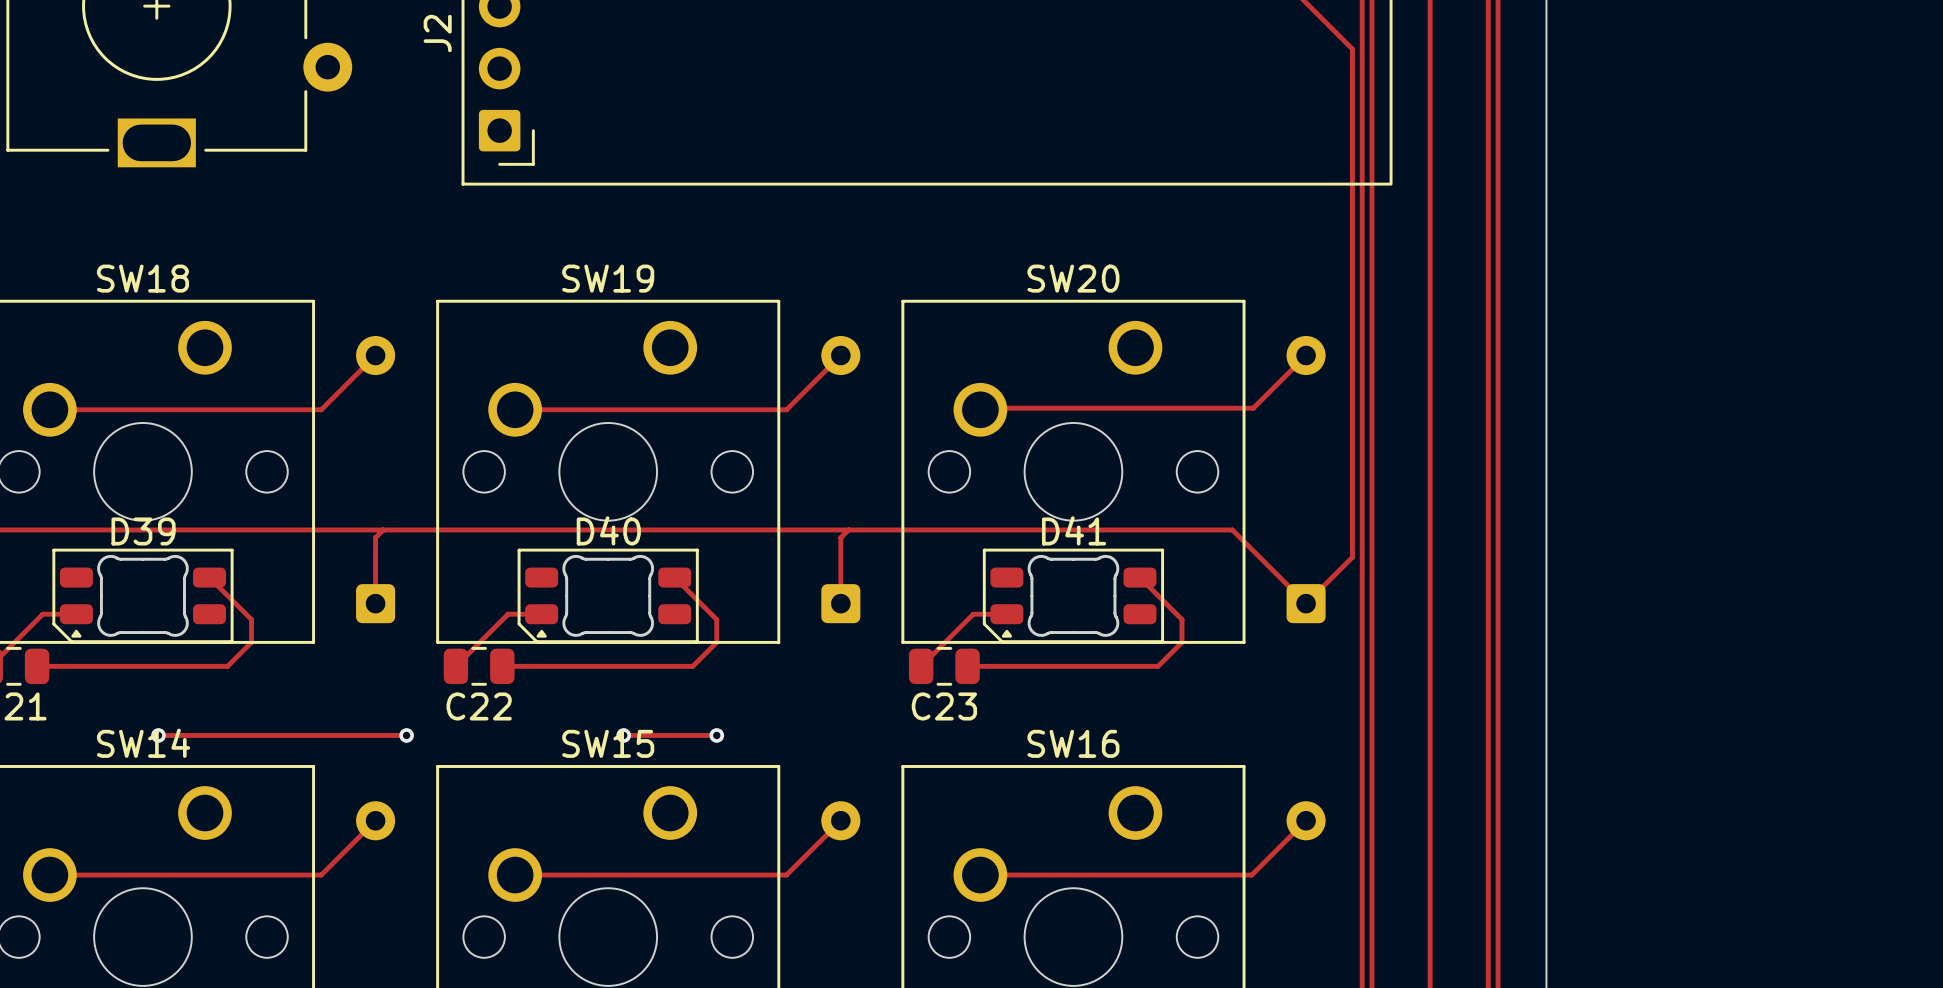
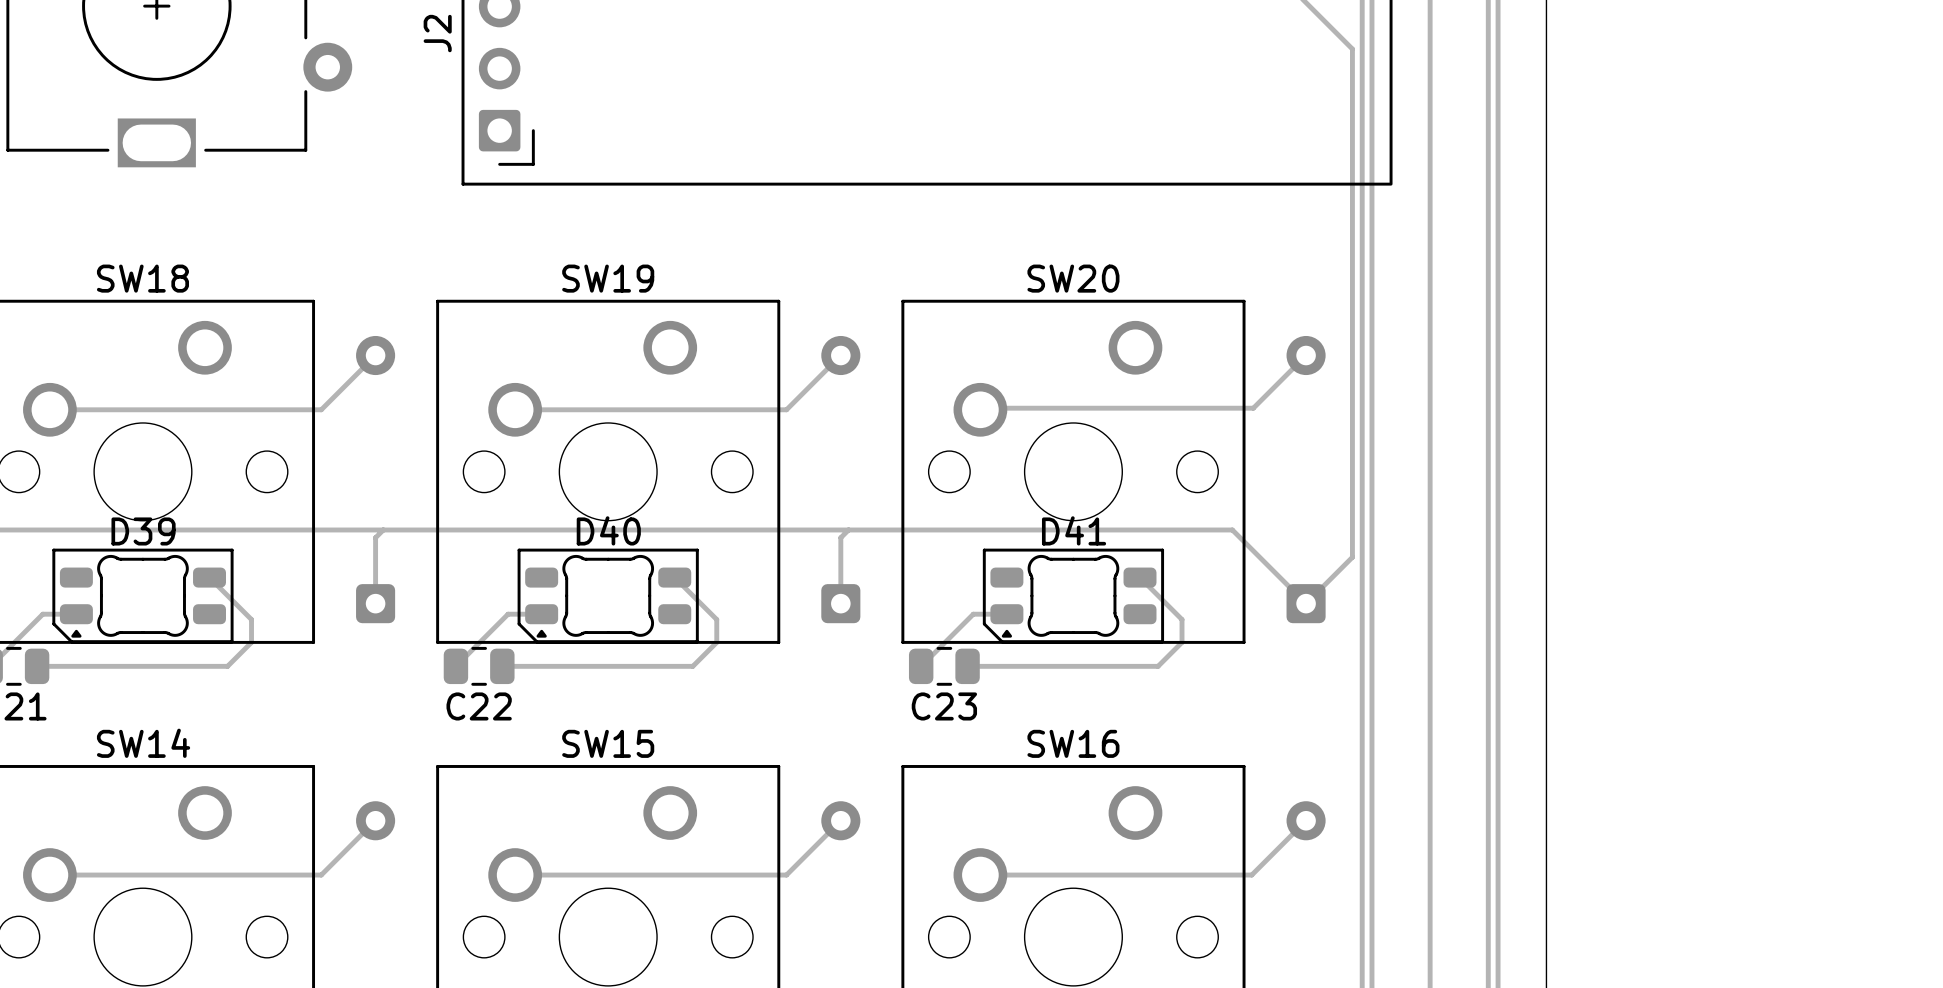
track: (158, 735) (406, 735) -> none
via: (158, 735) -> none
via: (406, 735) -> none
track: (623, 735) (716, 735) -> none
via: (623, 735) -> none
via: (716, 735) -> none

